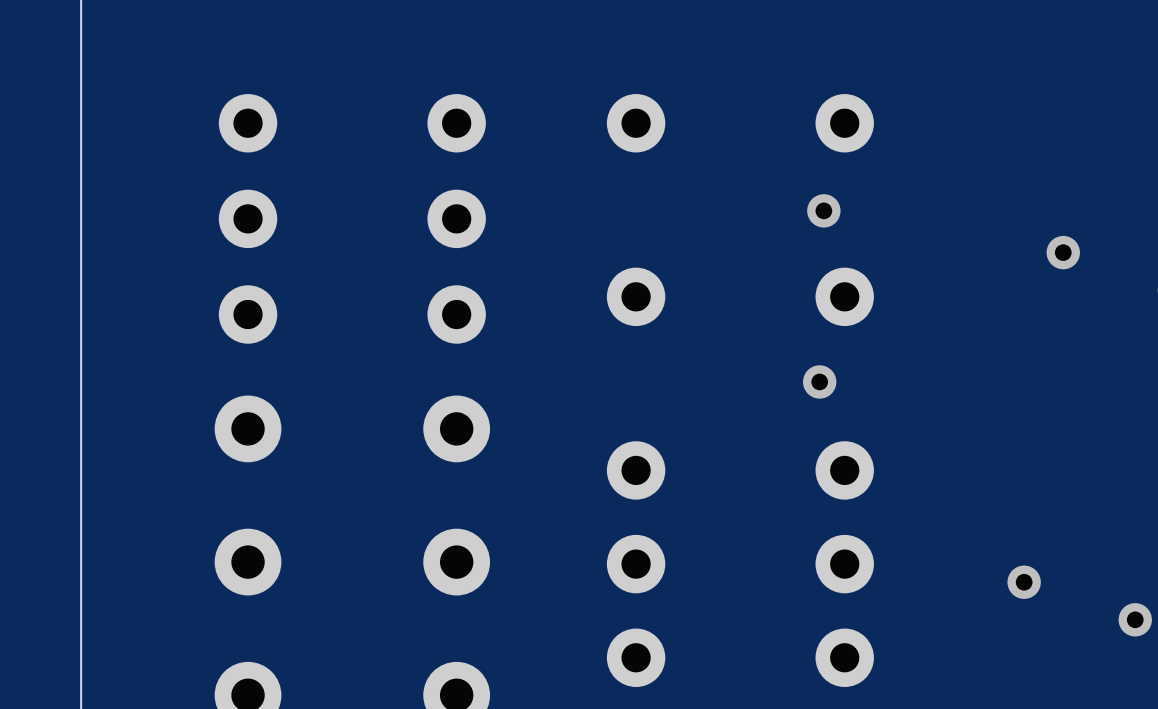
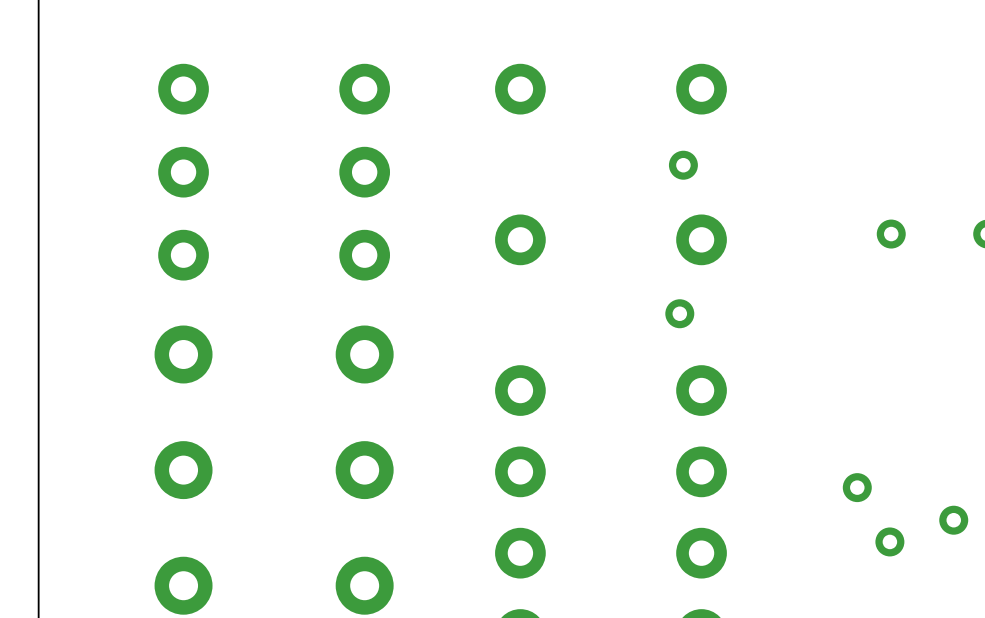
via position: (1063, 252) -> (891, 234)
via: none -> (889, 541)

